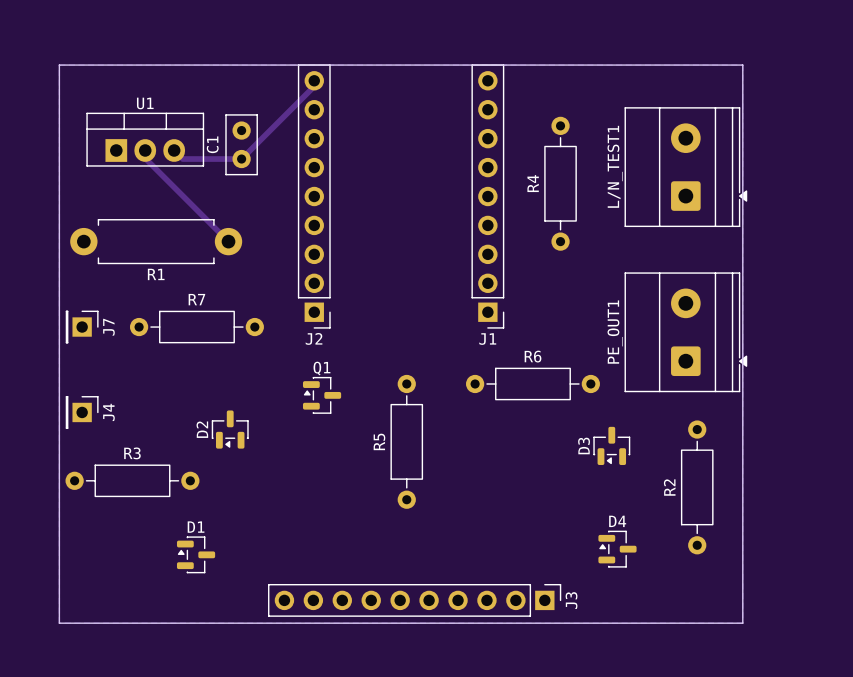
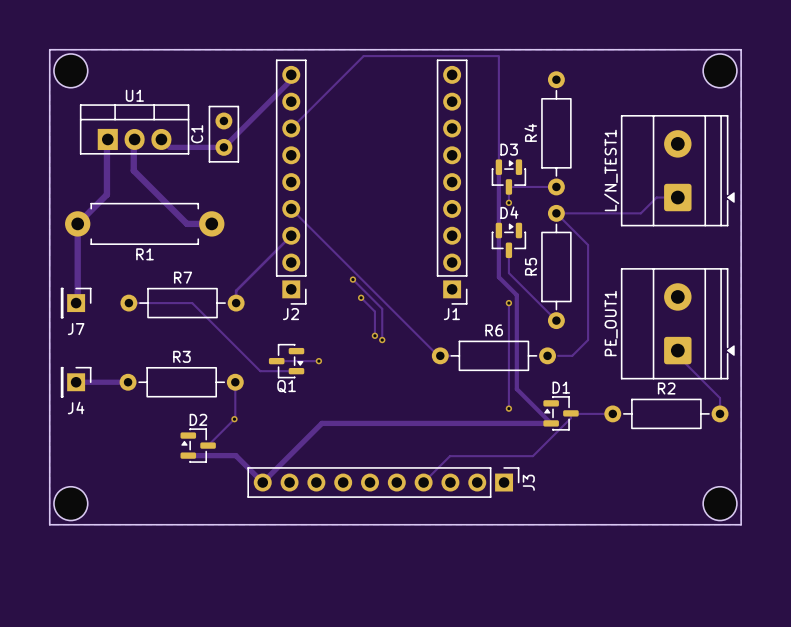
board edge: (59, 65) (742, 65) (742, 623) (59, 623) (59, 65) -> (49, 49) (49, 524) (741, 524) (741, 49) (49, 49)
part: none -> (70, 70)
part: none -> (720, 70)
track: none -> (291, 128) (363, 56) (498, 56) (498, 167)
track: (145, 150) (145, 158) (228, 241) -> (133, 144) (133, 170) (186, 223) (211, 223)
track: none -> (106, 144) (106, 194) (77, 223) (77, 301) (76, 303)
L/N_TEST1 position: (685, 167) -> (677, 170)
track: none -> (498, 167) (498, 277) (516, 295) (516, 389) (551, 423) (321, 423) (262, 482) (235, 455) (188, 455)
R4 position: (560, 183) -> (556, 133)
track: none -> (556, 186) (508, 186) (508, 202)
track: none -> (677, 197) (656, 197) (640, 213) (556, 213) (588, 245) (588, 340) (572, 355) (558, 355)
via: none -> (508, 202)
track: none -> (291, 208) (438, 355) (450, 355)
track: none -> (291, 235) (236, 290) (236, 303)
track: none -> (508, 250) (508, 273) (556, 320)
track: none -> (352, 279) (382, 308) (382, 340)
via: none -> (352, 279)
track: none -> (361, 297) (374, 311) (374, 335)
via: none -> (361, 297)
J7 name rotation: 0° (108, 327) -> 90° clockwise (76, 329)
J7 name position: J7 (108, 327) -> J7 (76, 329)
track: none -> (128, 303) (192, 303) (260, 371) (296, 371)
track: none -> (508, 303) (508, 408)
via: none -> (508, 303)
PE_OUT1 position: (685, 332) -> (677, 323)
via: none -> (374, 335)
via: none -> (382, 340)
track: none -> (677, 350) (677, 355) (720, 398) (720, 413)
track: none -> (276, 361) (318, 361)
via: none -> (318, 361)
Q1 rotation: 0° (322, 395) -> 180° (286, 361)
track: none -> (76, 382) (128, 382)
J4 name rotation: 0° (108, 412) -> 90° clockwise (76, 407)
J4 name position: J4 (108, 412) -> J4 (76, 407)
track: none -> (235, 382) (235, 418) (208, 445)
D2 rotation: 0° (230, 429) -> 90° clockwise (198, 445)
D2 position: (230, 429) -> (198, 445)
via: none -> (508, 408)
R5 position: (406, 441) -> (556, 266)
D3 name position: D3 (584, 445) -> D3 (509, 149)
D3 rotation: 0° (611, 445) -> 180° (508, 177)
D3 position: (611, 445) -> (508, 177)
track: none -> (612, 413) (570, 413) (570, 418) (532, 456) (450, 456) (423, 482)
via: none -> (234, 419)
R3 position: (132, 480) -> (181, 382)
R2 rotation: 0° (697, 487) -> 90° clockwise (666, 413)
part: none -> (70, 503)
part: none -> (720, 503)
D4 rotation: 0° (617, 549) -> 90° clockwise (508, 240)
D4 position: (617, 549) -> (508, 240)
D1 position: (196, 554) -> (561, 413)
J3 position: (414, 600) -> (383, 482)

